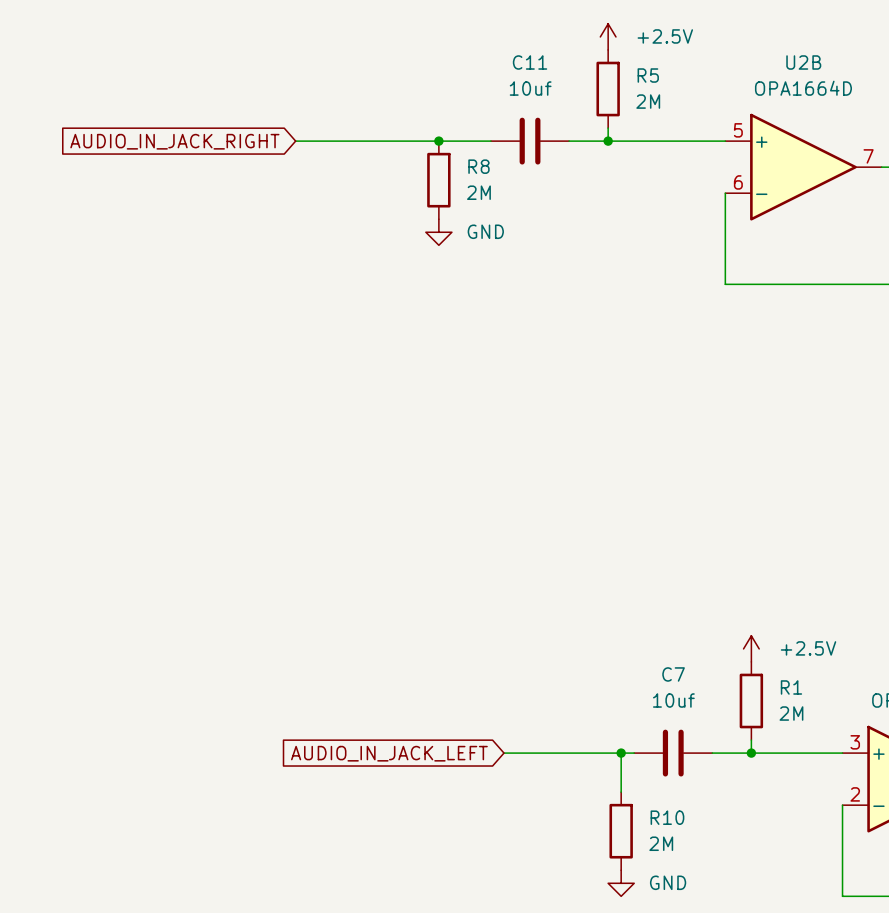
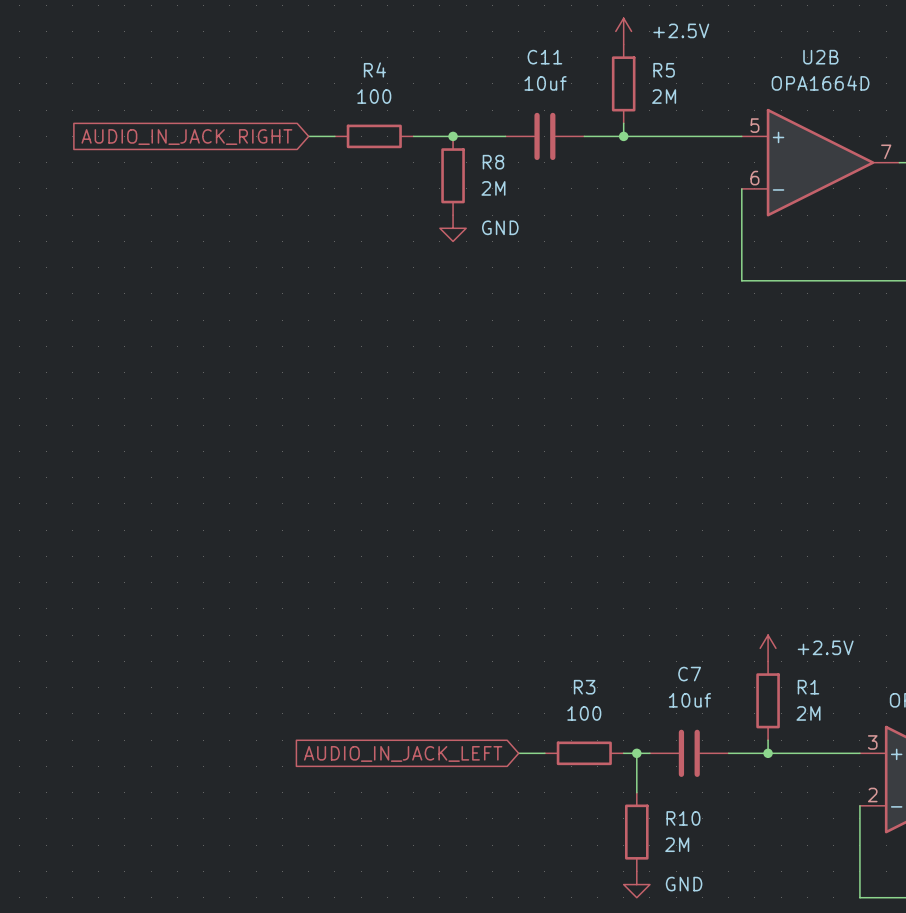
wire: (321, 141) (399, 141) -> none
R4: none -> 100 (374, 136)
wire: (530, 753) (608, 753) -> none
R3: none -> 100 (584, 753)

